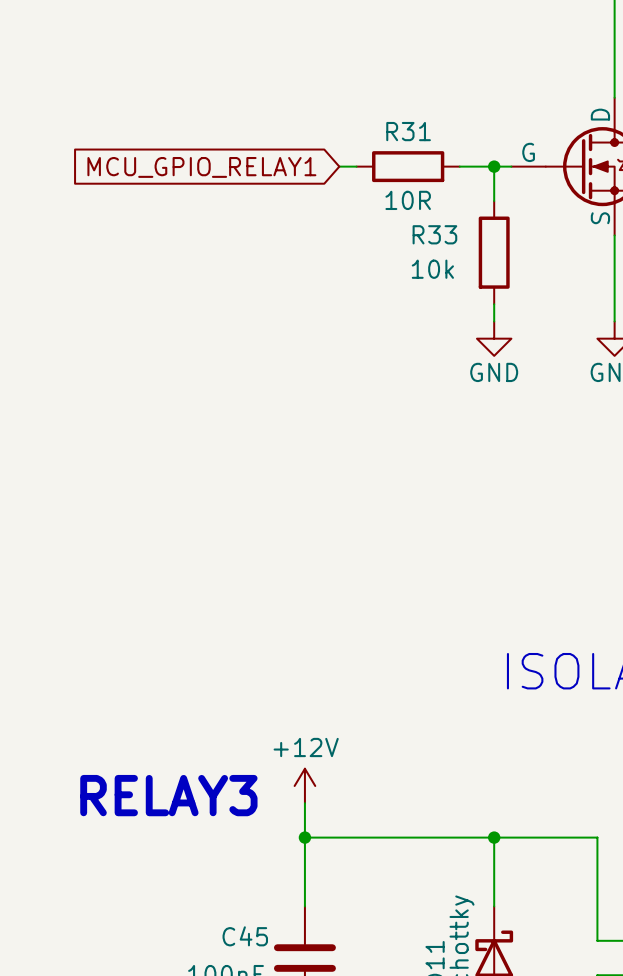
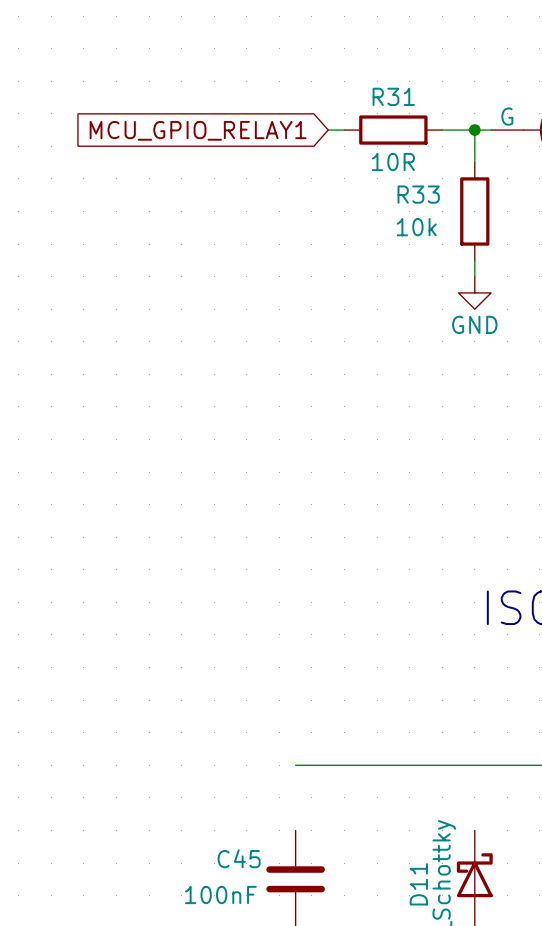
power symbol: +12V (304, 785) -> none
text: RELAY3 (168, 795) -> none
wire: (304, 803) (304, 906) -> none
junction: (304, 837) -> none
wire: (494, 837) (494, 906) -> none
junction: (494, 837) -> none

